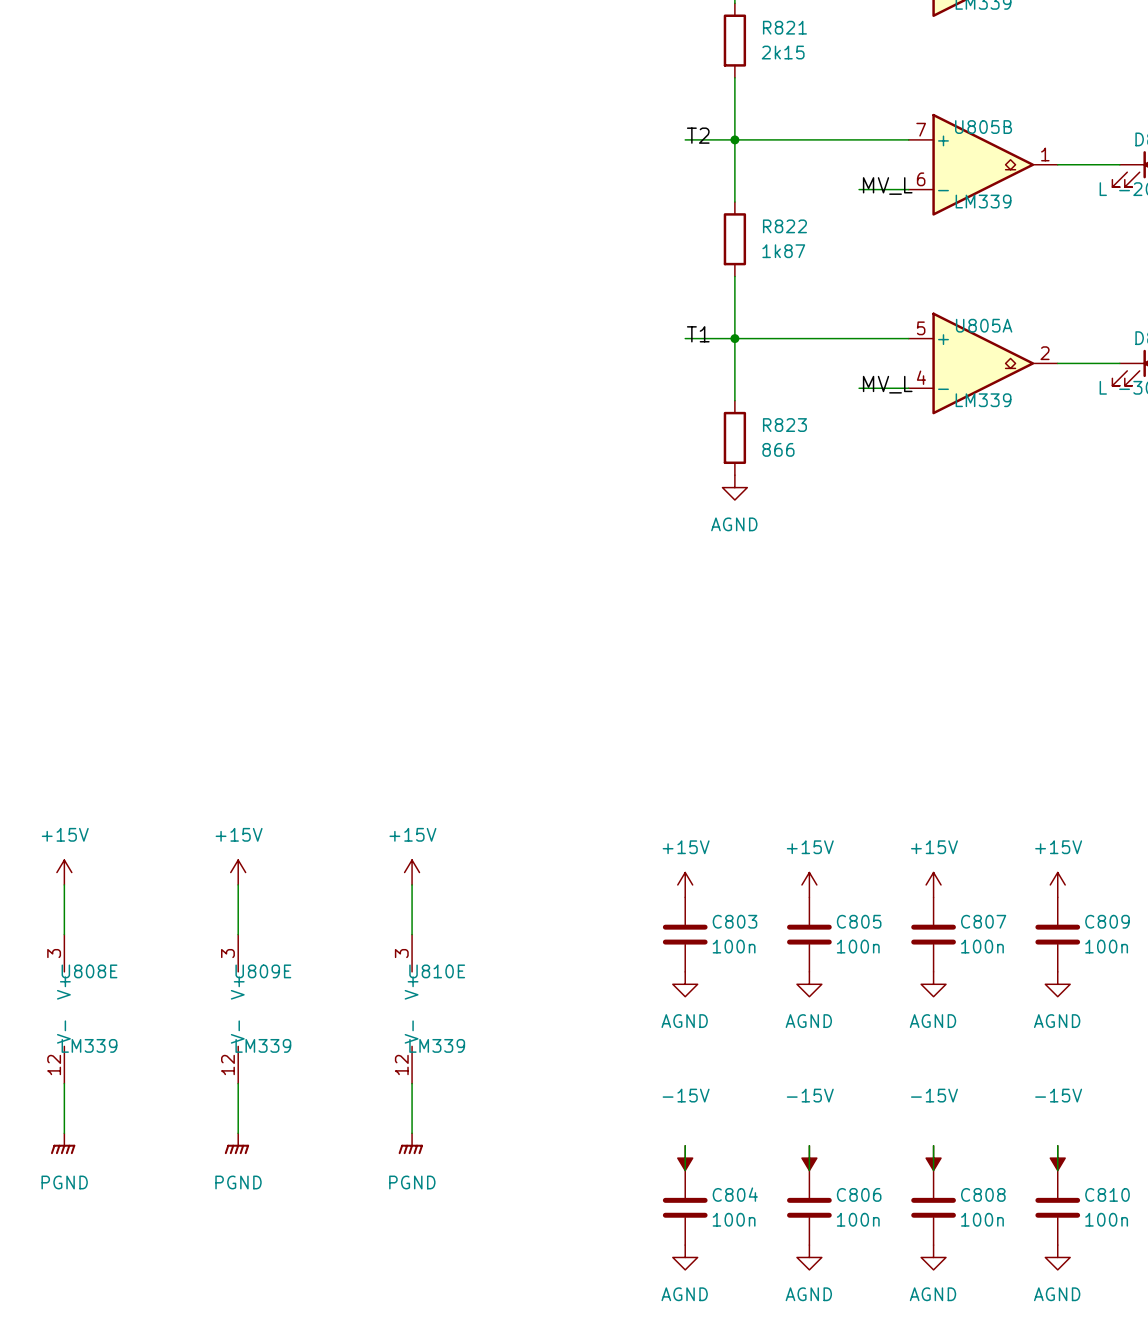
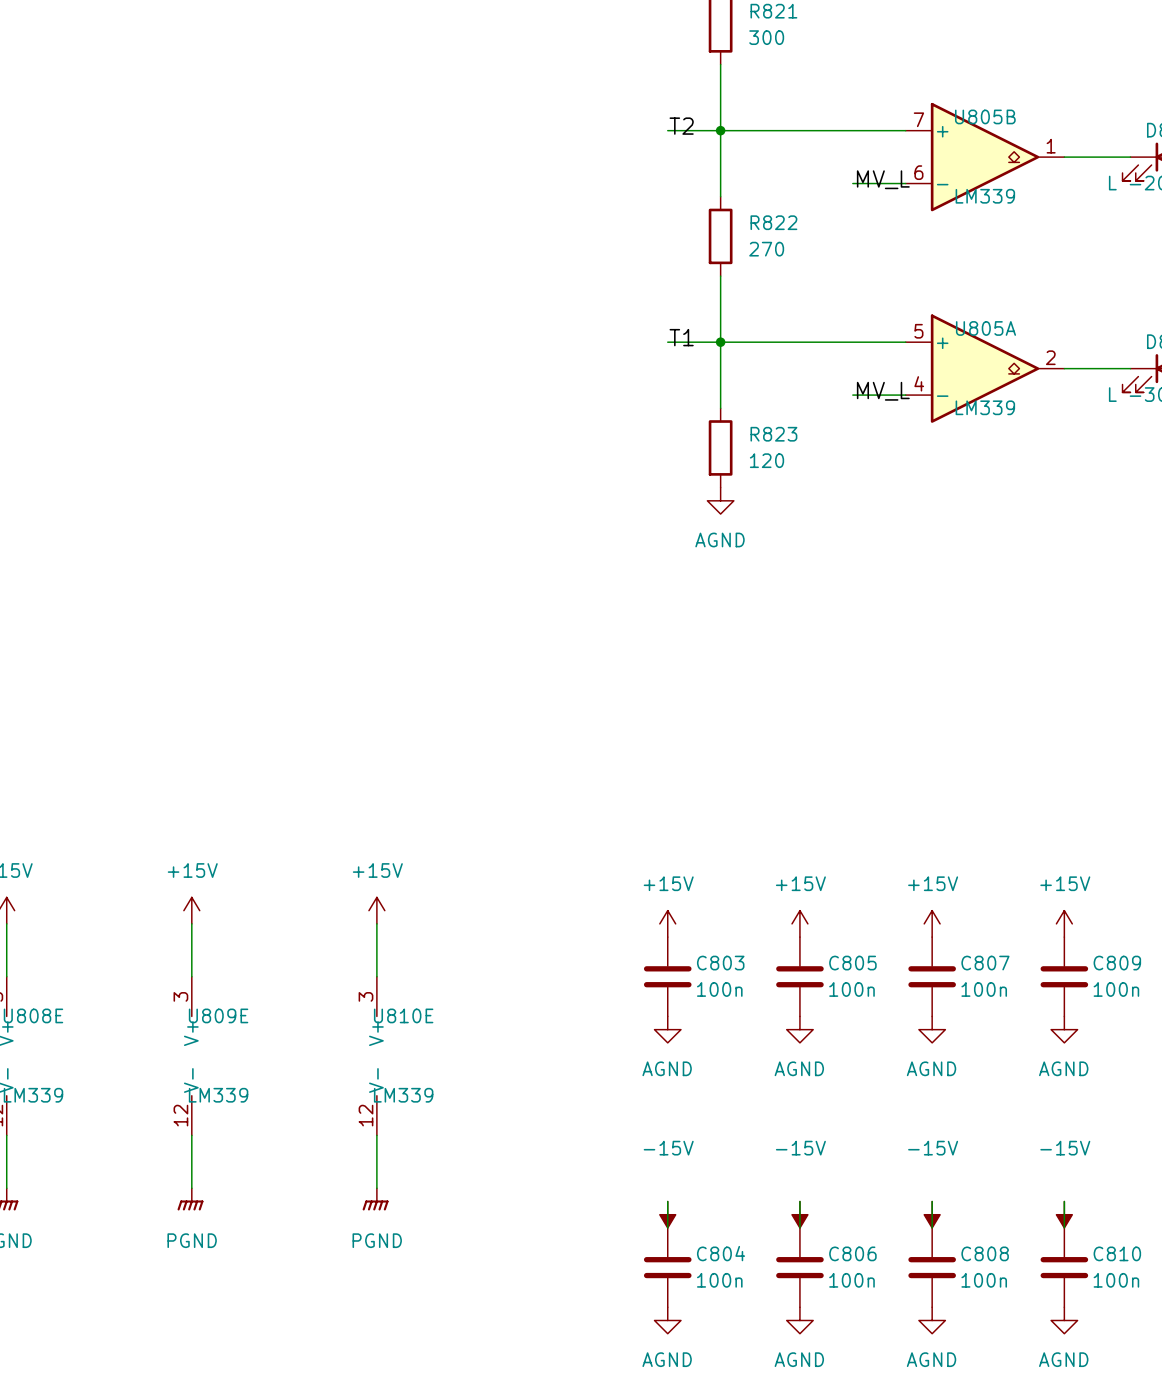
R821 value: 2k15 (783, 52) -> 300 (766, 37)
R822 value: 1k87 (783, 251) -> 270 (766, 249)
R823 value: 866 (778, 449) -> 120 (767, 460)

